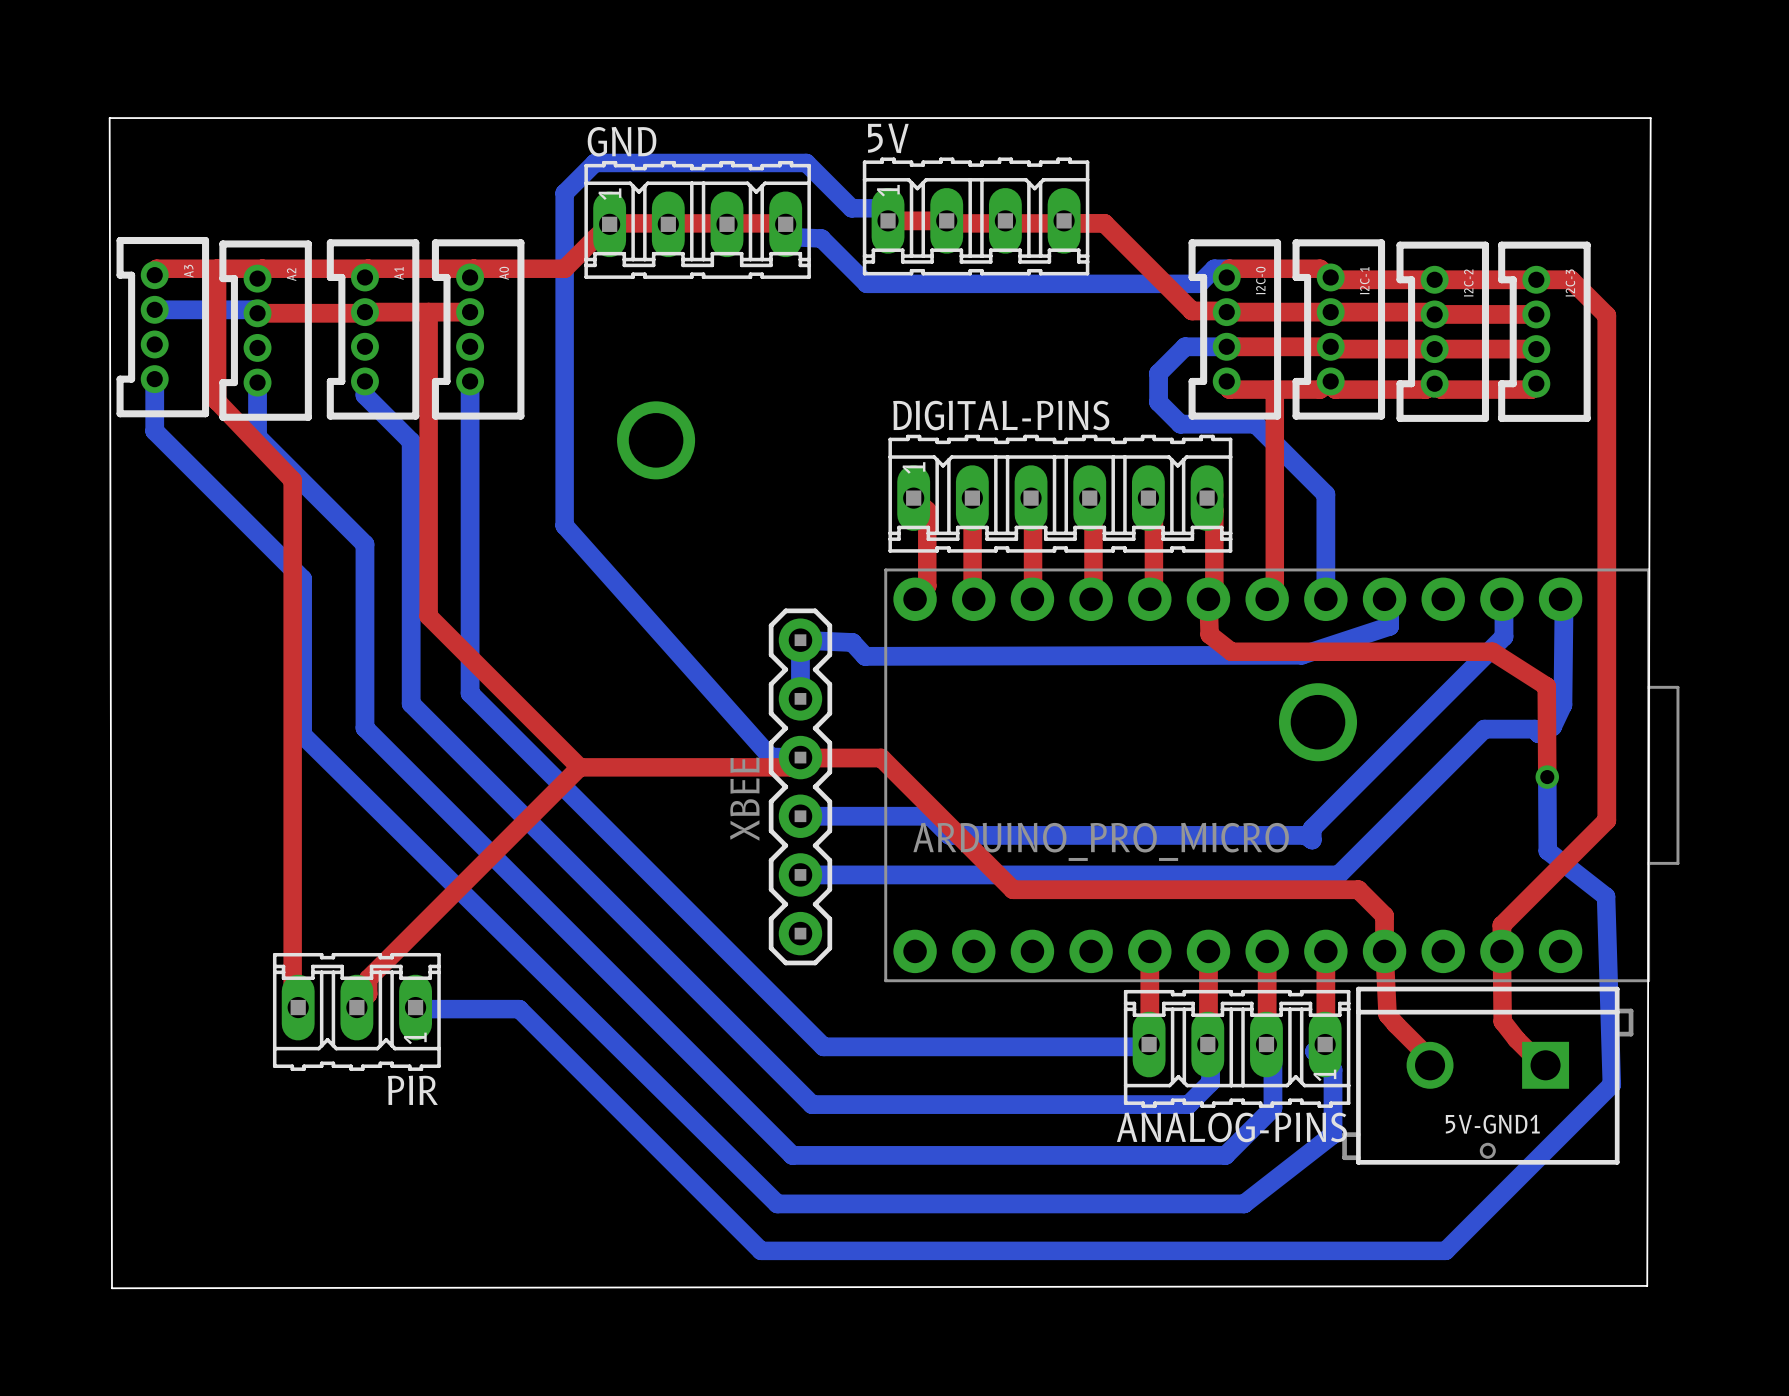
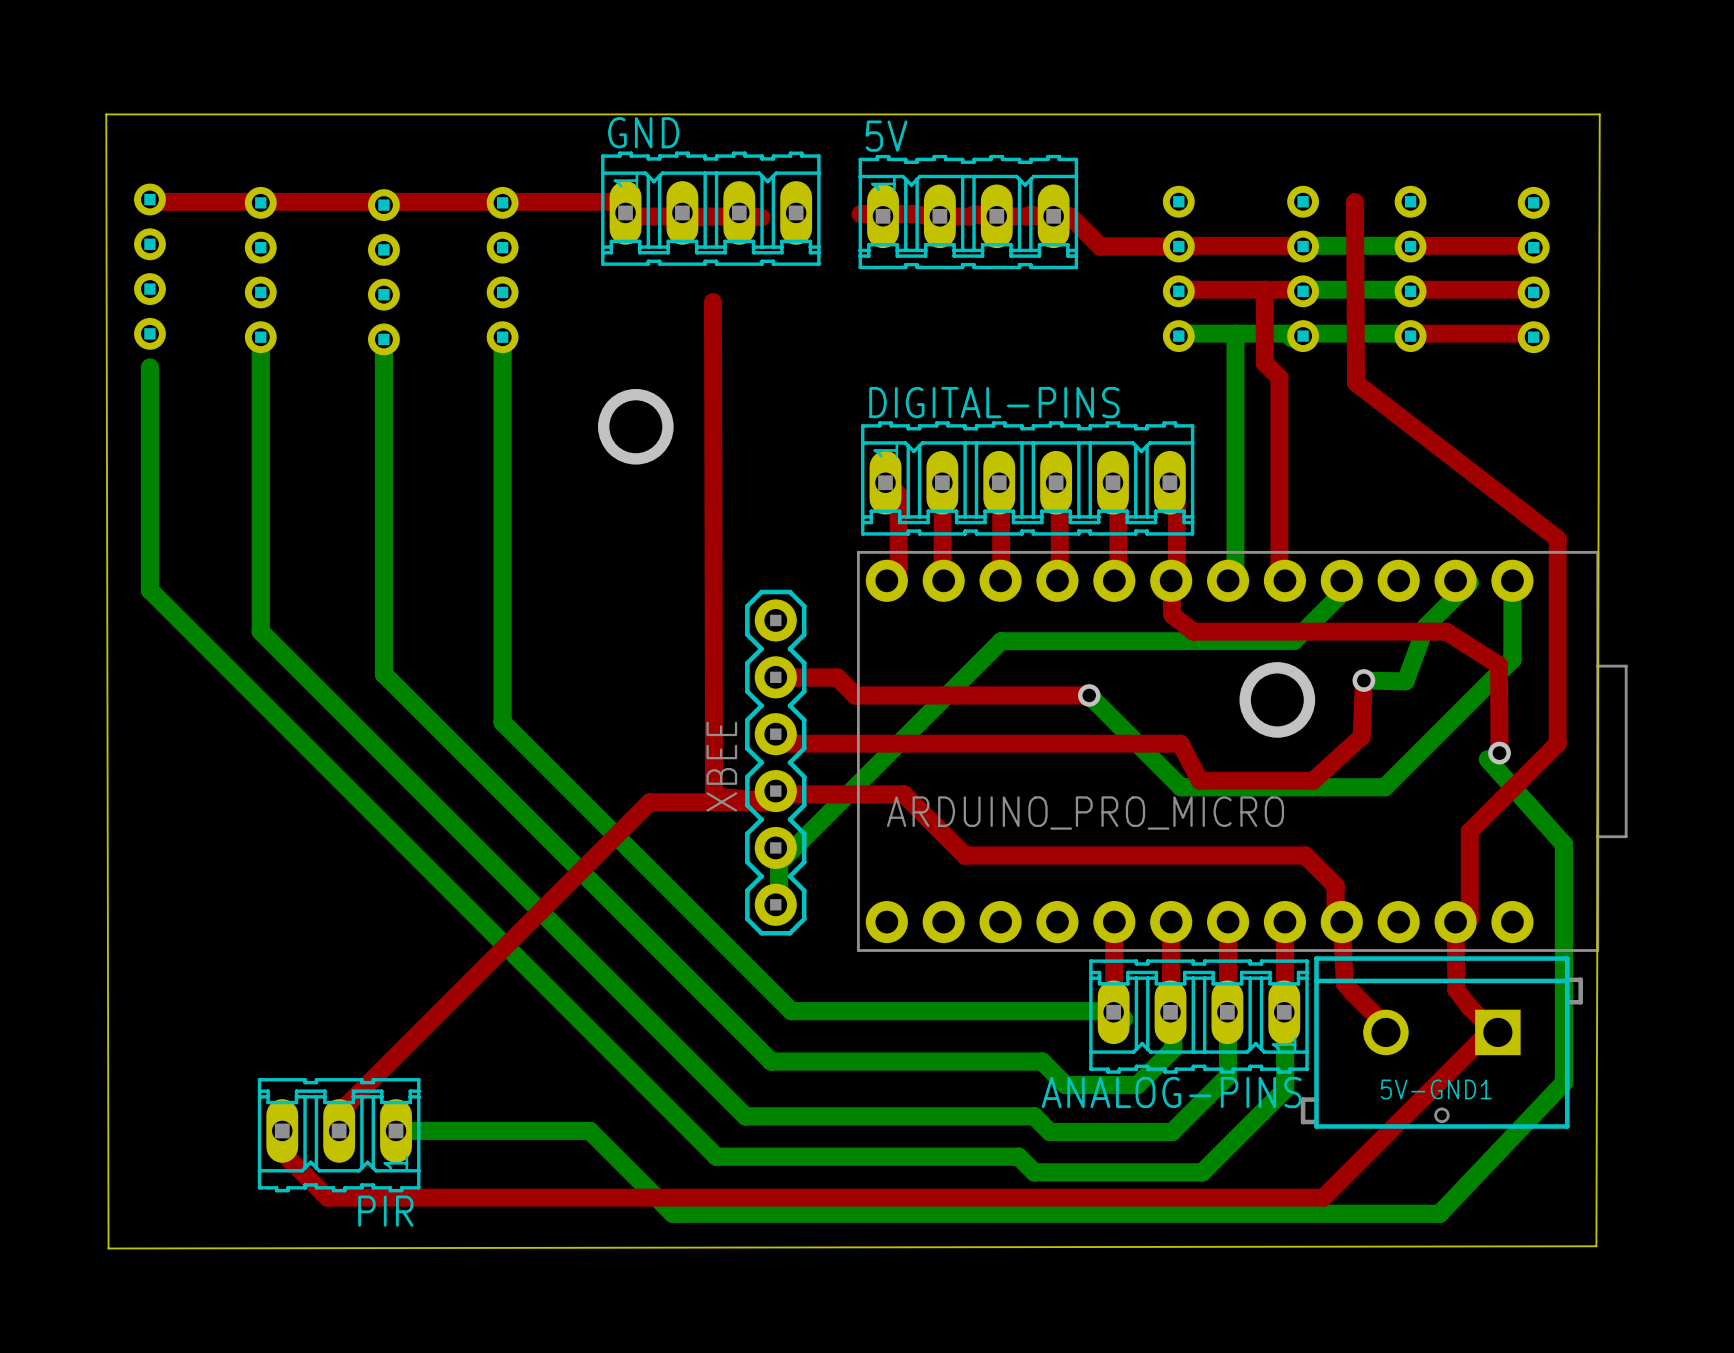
5V position: (976, 216) -> (968, 212)
GND position: (697, 219) -> (710, 208)
bottom track: (888, 220) (881, 208) (851, 208) (806, 162) (594, 162) (564, 193) (564, 525) (770, 756) (800, 757) -> none
top track: (670, 223) (609, 223) (564, 268) (156, 268) (154, 275) -> (649, 216) (635, 216) (625, 212) (620, 201) (386, 201) (383, 205) (371, 201) (151, 201) (149, 199)
bottom track: (785, 224) (797, 237) (821, 238) (866, 283) (1199, 283) (1214, 268) (1229, 268) (1226, 277) -> none
top track: (1135, 254) (1192, 310) (1536, 314) -> (1100, 246) (1303, 246)
bottom track: none -> (1303, 246) (1410, 246)
top track: none -> (1410, 246) (1528, 245) (1533, 247)
top track: (217, 268) (217, 401) (292, 480) (292, 994) (298, 1007) -> none
part: none -> (149, 266)
part: none -> (1178, 268)
top track: (1226, 277) (1229, 268) (1320, 268) (1333, 279) (1570, 279) (1606, 315) (1606, 820) (1501, 925) (1501, 951) -> (1354, 201) (1356, 383) (1557, 538) (1557, 743) (1469, 831) (1469, 919) (1455, 922)
part: none -> (1303, 268)
part: none -> (1410, 268)
part: none -> (260, 270)
part: none -> (502, 270)
part: none -> (1533, 270)
part: none -> (383, 272)
top track: none -> (1264, 289) (1264, 362) (1279, 377) (1279, 567) (1284, 580)
top track: none -> (1178, 291) (1191, 289) (1303, 291)
bottom track: none -> (1303, 291) (1308, 289) (1410, 291)
top track: none -> (1410, 291) (1411, 289) (1528, 289) (1533, 292)
bottom track: (154, 309) (254, 309) (257, 313) -> none
top track: none -> (712, 301) (714, 796) (767, 801) (779, 794)
top track: (428, 312) (428, 616) (579, 767) -> none
top track: (470, 312) (257, 313) -> none
A3: (162, 327) -> none
A1: (373, 329) -> none
A0: (478, 329) -> none
I2C-0: (1234, 329) -> none
I2C-1: (1338, 329) -> none
A2: (265, 330) -> none
I2C-2: (1442, 331) -> none
I2C-3: (1544, 331) -> none
bottom track: none -> (1235, 333) (1235, 567) (1228, 580)
bottom track: none -> (1178, 336) (1191, 333) (1294, 333) (1303, 336) (1308, 333) (1396, 333) (1410, 336)
top track: (1226, 346) (1330, 346) (1333, 349) (1536, 349) -> none
bottom track: (1238, 346) (1185, 346) (1158, 373) (1158, 402) (1180, 424) (1255, 424) (1325, 494) (1325, 599) -> none
top track: none -> (1410, 336) (1411, 333) (1528, 333) (1533, 337)
bottom track: (364, 381) (364, 395) (411, 441) (411, 703) (812, 1104) (1188, 1104) -> (383, 339) (383, 674) (771, 1061) (1042, 1061) (1065, 1085) (1137, 1085) (1151, 1070)
bottom track: (470, 381) (470, 693) (823, 1046) (1146, 1046) (1149, 1044) -> (502, 337) (502, 722) (791, 1011) (1116, 1011) (1123, 1019) (1120, 1019) (1113, 1012)
top track: (1226, 381) (1229, 389) (1320, 389) (1330, 381) (1335, 389) (1425, 389) (1434, 383) (1441, 389) (1531, 389) (1536, 383) -> none
bottom track: (257, 382) (257, 436) (364, 544) (364, 727) (792, 1155) (1225, 1155) (1272, 1108) (1272, 1050) (1267, 1045) -> (260, 337) (260, 631) (745, 1116) (1034, 1116) (1050, 1132) (1172, 1132) (1228, 1076) (1228, 1012)
top track: (1274, 389) (1274, 586) (1267, 599) -> none
bottom track: (154, 431) (302, 578) (302, 734) (777, 1203) (1244, 1203) (1333, 1134) (1333, 1069) (1314, 1051) (1318, 1051) (1325, 1044) -> (149, 417) (149, 590) (716, 1156) (1018, 1156) (1034, 1172) (1202, 1172) (1285, 1089) (1284, 1012)
bottom track: (1384, 599) (1389, 604) (1389, 626) (1301, 655) (865, 656) (852, 642) (800, 640) (800, 698) -> (1341, 580) (1337, 582) (1337, 597) (1294, 641) (1001, 641) (781, 860) (779, 851) (779, 908)
bottom track: (1501, 599) (1503, 601) (1503, 636) (1312, 828) (1312, 840) (1305, 835) (949, 835) (930, 816) (800, 816) -> (1455, 580) (1469, 582) (1425, 626) (1405, 681) (1363, 680)
bottom track: (1560, 599) (1564, 602) (1562, 704) (1552, 726) (1549, 725) (1538, 733) (1535, 729) (1484, 729) (1338, 874) (800, 874) -> (1512, 580) (1512, 659) (1384, 787) (1181, 787) (1089, 695)
top track: none -> (779, 680) (782, 677) (837, 677) (855, 695) (1089, 695)
top track: none -> (1363, 680) (1361, 736) (1313, 780) (1199, 780) (1180, 743) (781, 743) (779, 737)
via: none -> (1363, 680)
via: none -> (1089, 695)
top track: (579, 767) (791, 767) (800, 757) (881, 758) (1013, 889) (1358, 889) (1384, 915) (1384, 951) -> (779, 794) (903, 794) (964, 855) (1305, 855) (1335, 885) (1335, 915) (1341, 922)
top track: (579, 767) (368, 978) (368, 994) (356, 1007) -> none
bottom track: (1547, 777) (1547, 851) (1606, 896) (1611, 1084) (1445, 1250) (761, 1250) (519, 1009) (415, 1007) -> none
bottom track: none -> (1487, 759) (1563, 844) (1563, 1082) (1439, 1213) (672, 1213) (589, 1130) (396, 1130)
top track: none -> (779, 794) (766, 802) (649, 802) (342, 1109) (342, 1124) (339, 1130)
PIR position: (356, 1011) -> (339, 1135)
top track: none -> (1497, 1032) (1484, 1036) (1323, 1197) (327, 1197) (283, 1153) (282, 1130)

